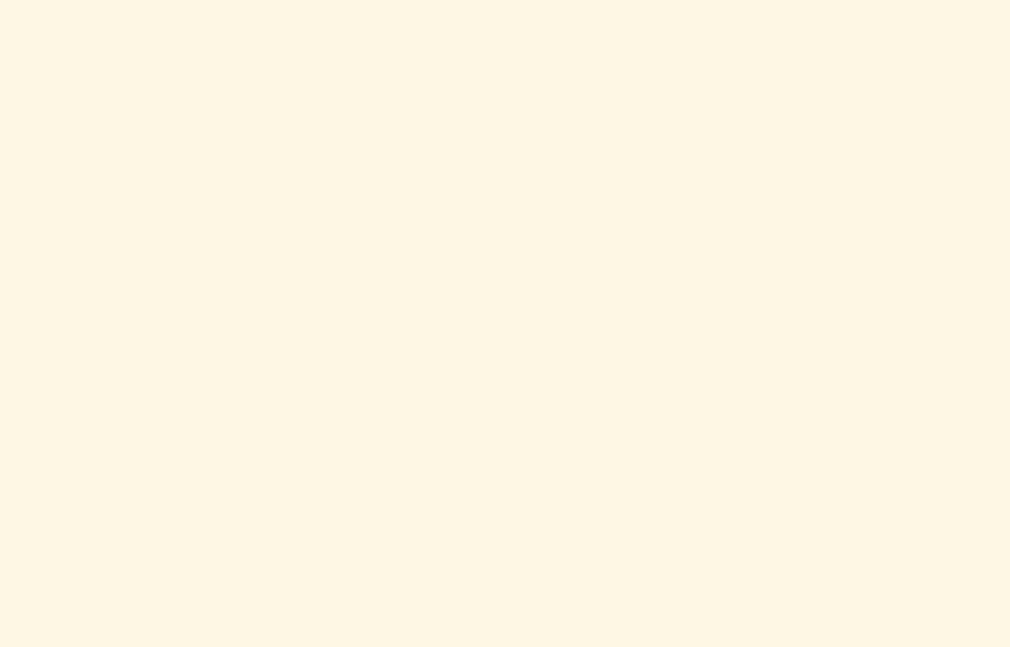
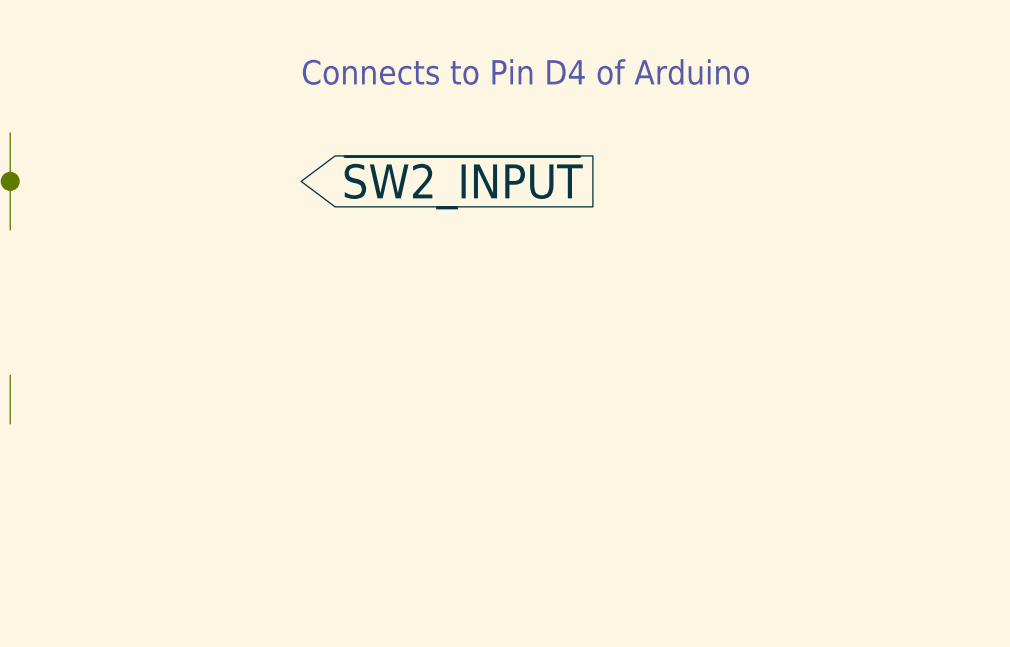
text: none -> Connects to Pin D4 of Arduino (525, 72)
wire: none -> (10, 132) (10, 229)
junction: none -> (10, 181)
global label: none -> ~{SW2_INPUT} (463, 182)
wire: none -> (10, 375) (10, 423)

